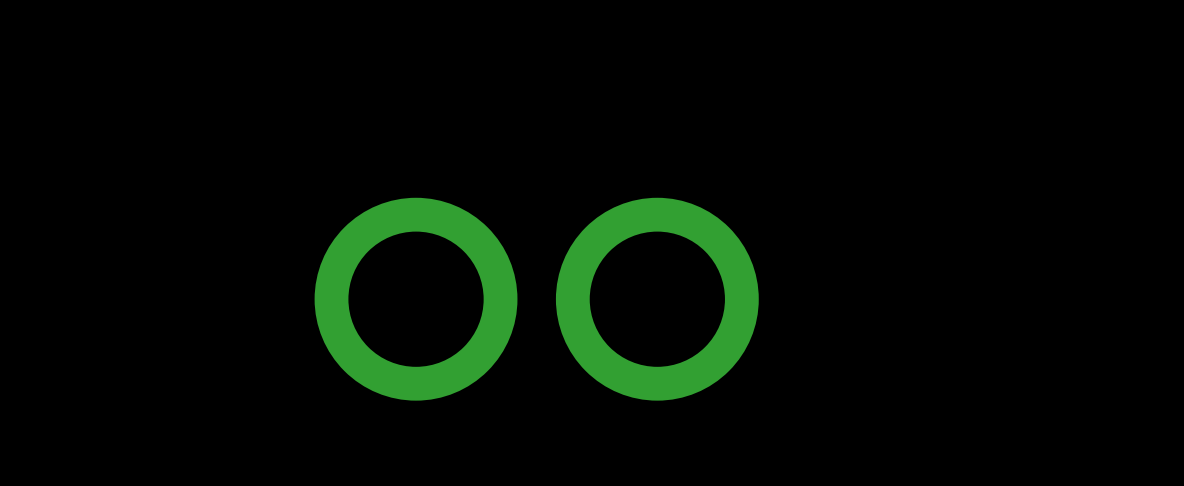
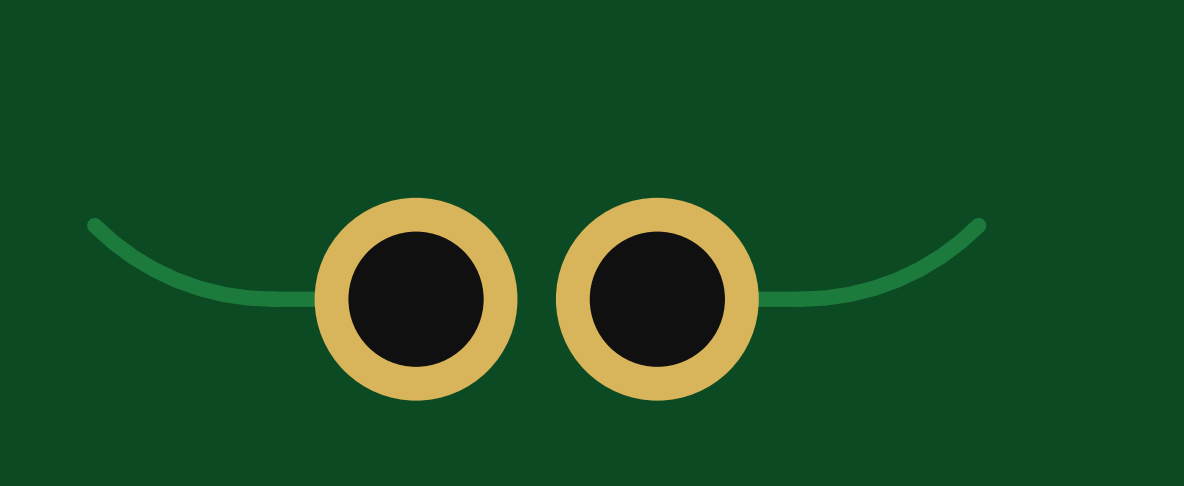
track: none -> (94, 225) (132, 256) (154, 269) (199, 288) (223, 294) (272, 299) (416, 299)
track: none -> (978, 225) (960, 242) (919, 269) (873, 288) (849, 294) (800, 299) (657, 299)

